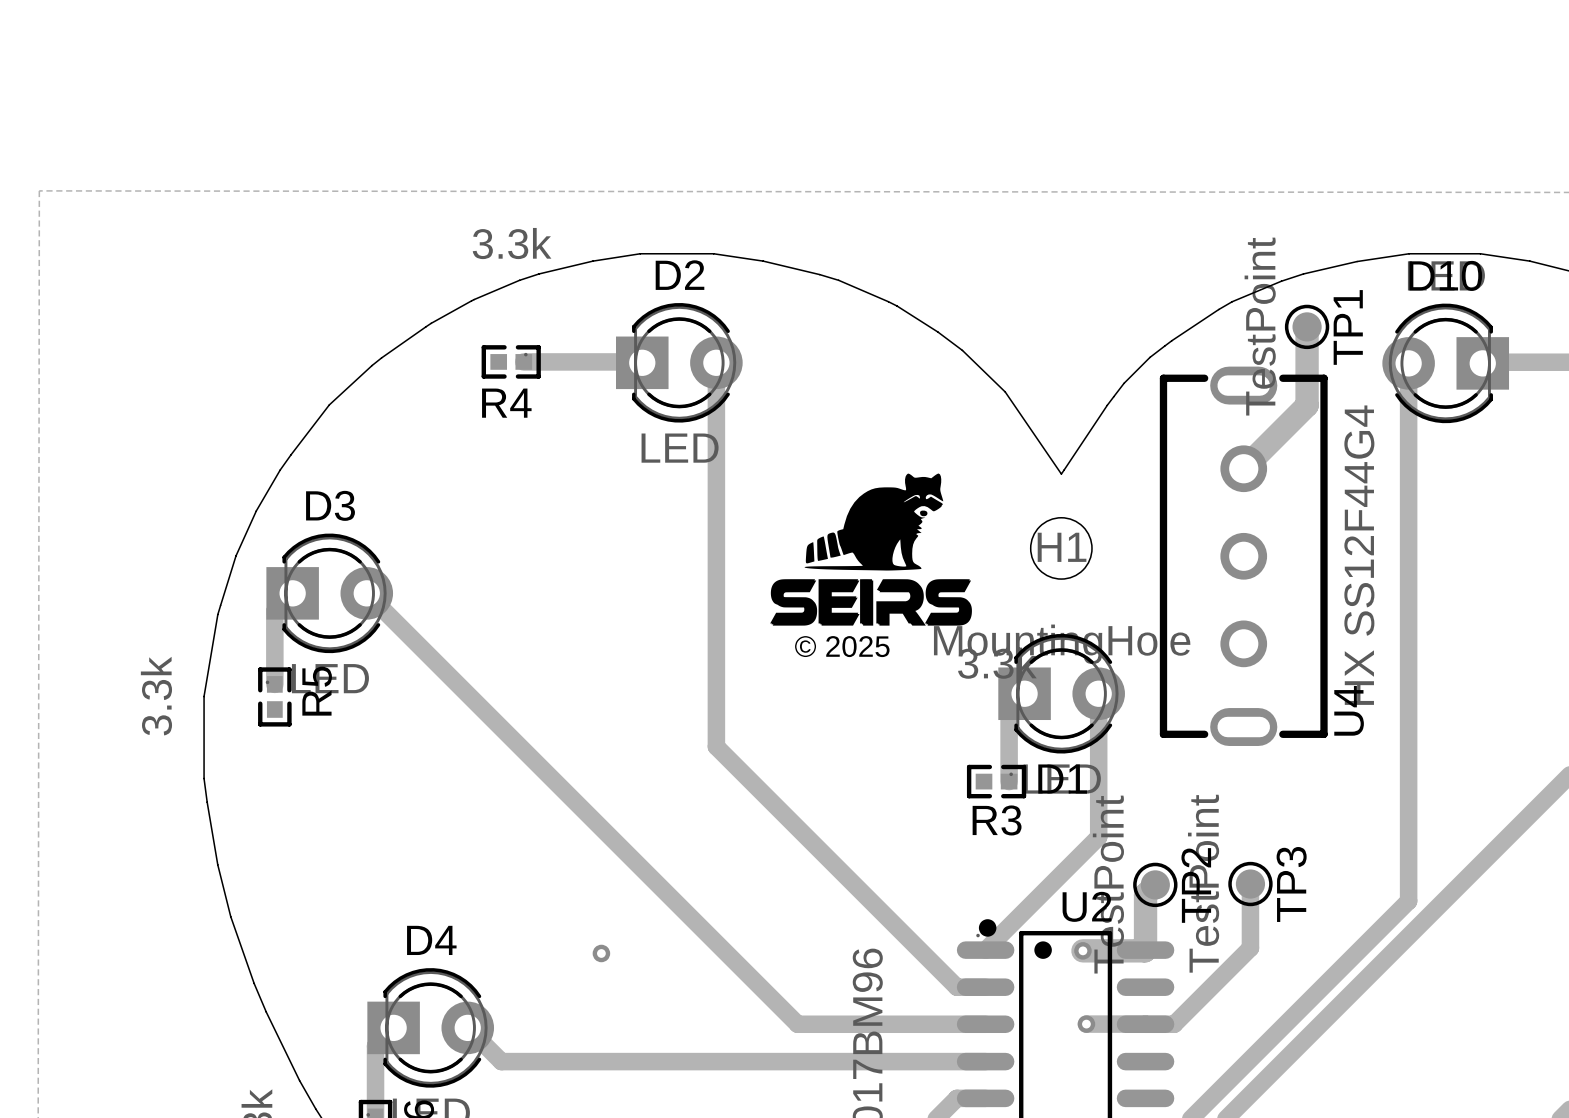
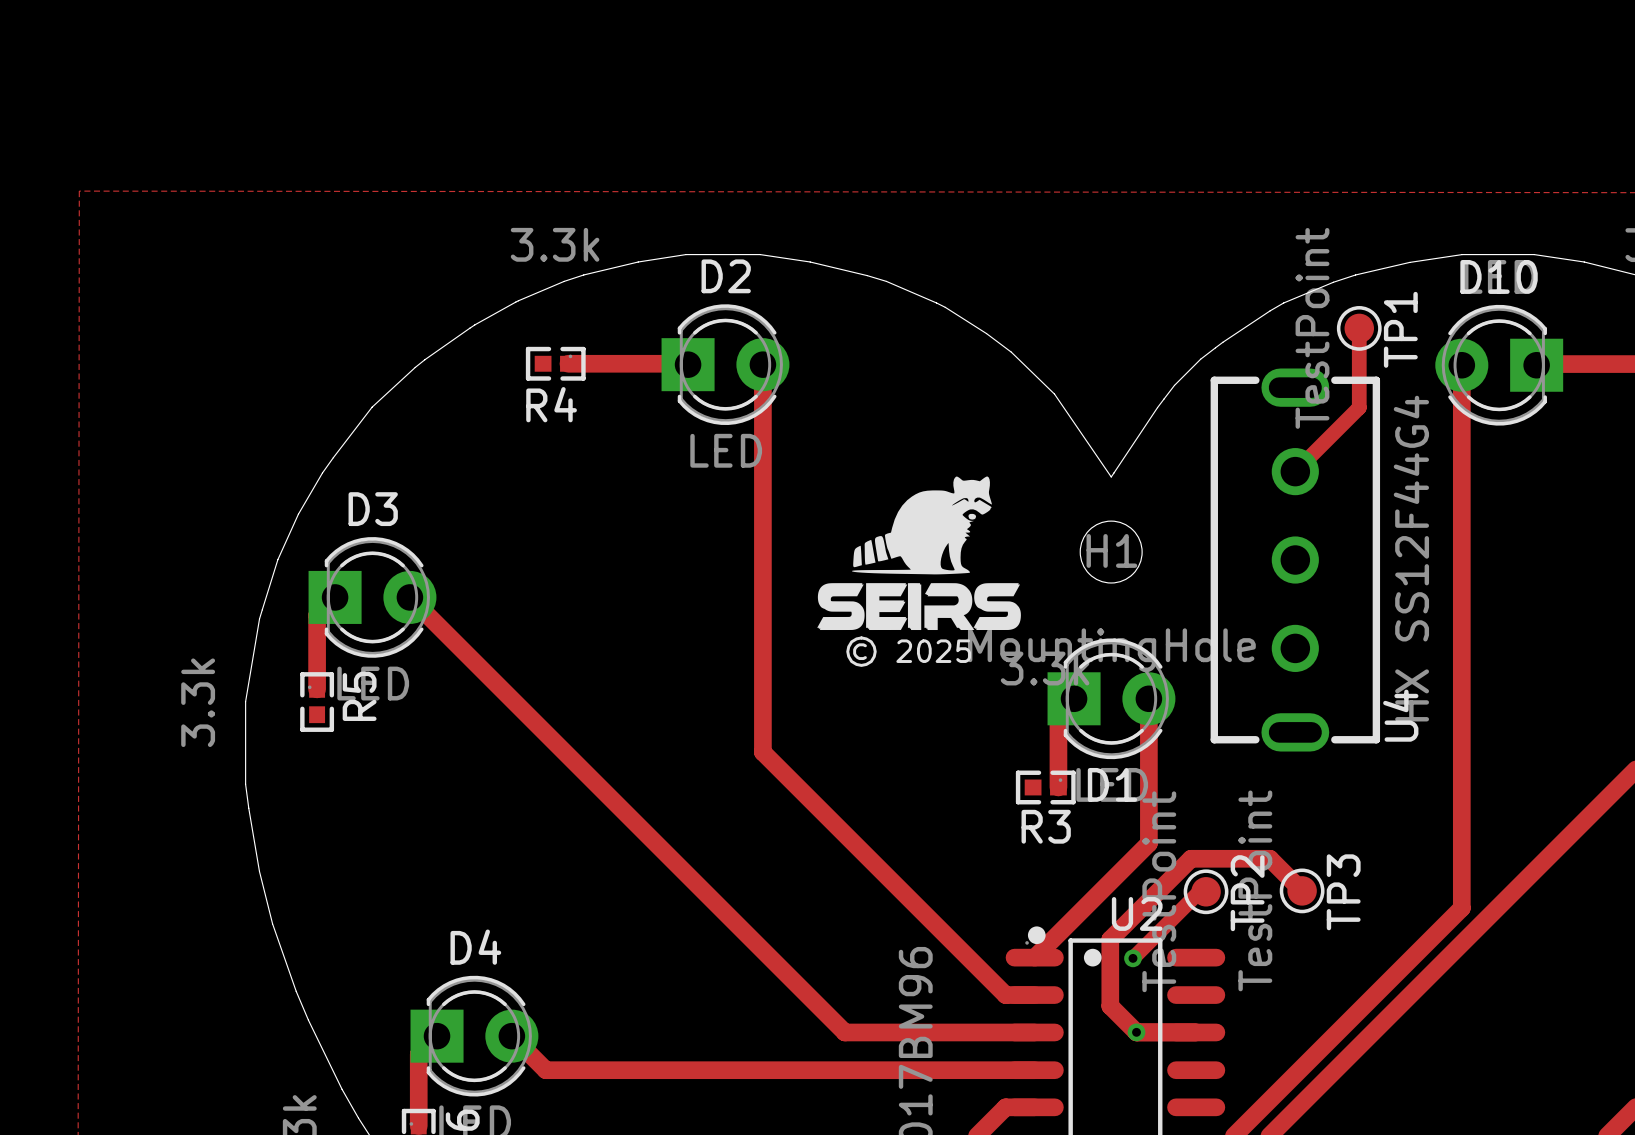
track width: thick (1307, 326) (1307, 405) (1243, 468) -> thin (1359, 328) (1359, 407) (1295, 471)
track: (1155, 884) (1145, 894) (1144, 950) (1082, 950) -> (1199, 891) (1132, 958)
track: (1250, 884) (1250, 948) (1174, 1024) (1145, 1024) -> (1302, 890) (1269, 858) (1191, 858) (1110, 939) (1110, 1006) (1136, 1032) (1196, 1032)
via: (601, 953) -> none

